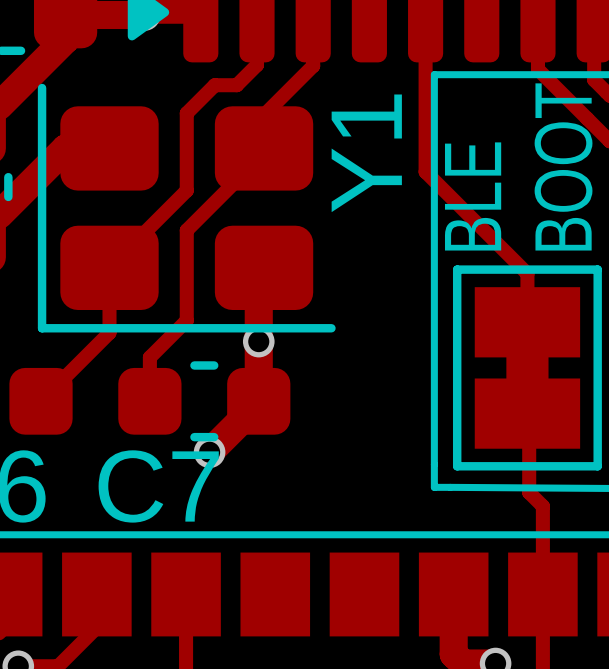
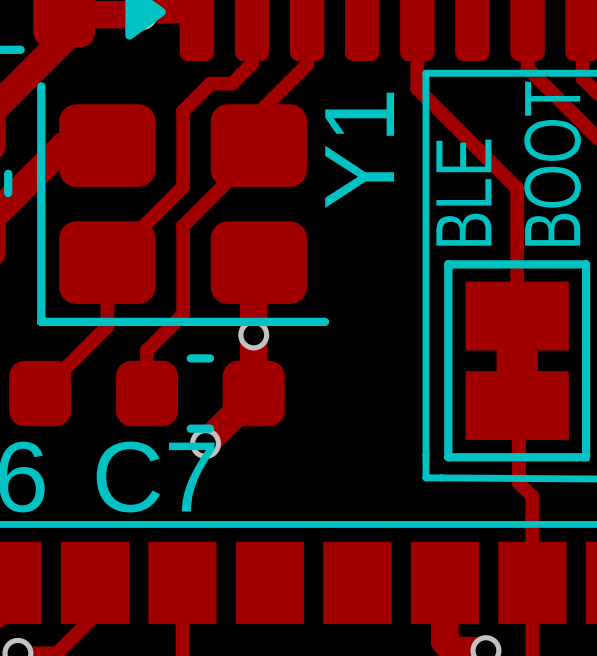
track: (425, 90) (425, 171) (527, 273) -> (417, 88) (517, 188) (517, 268)

